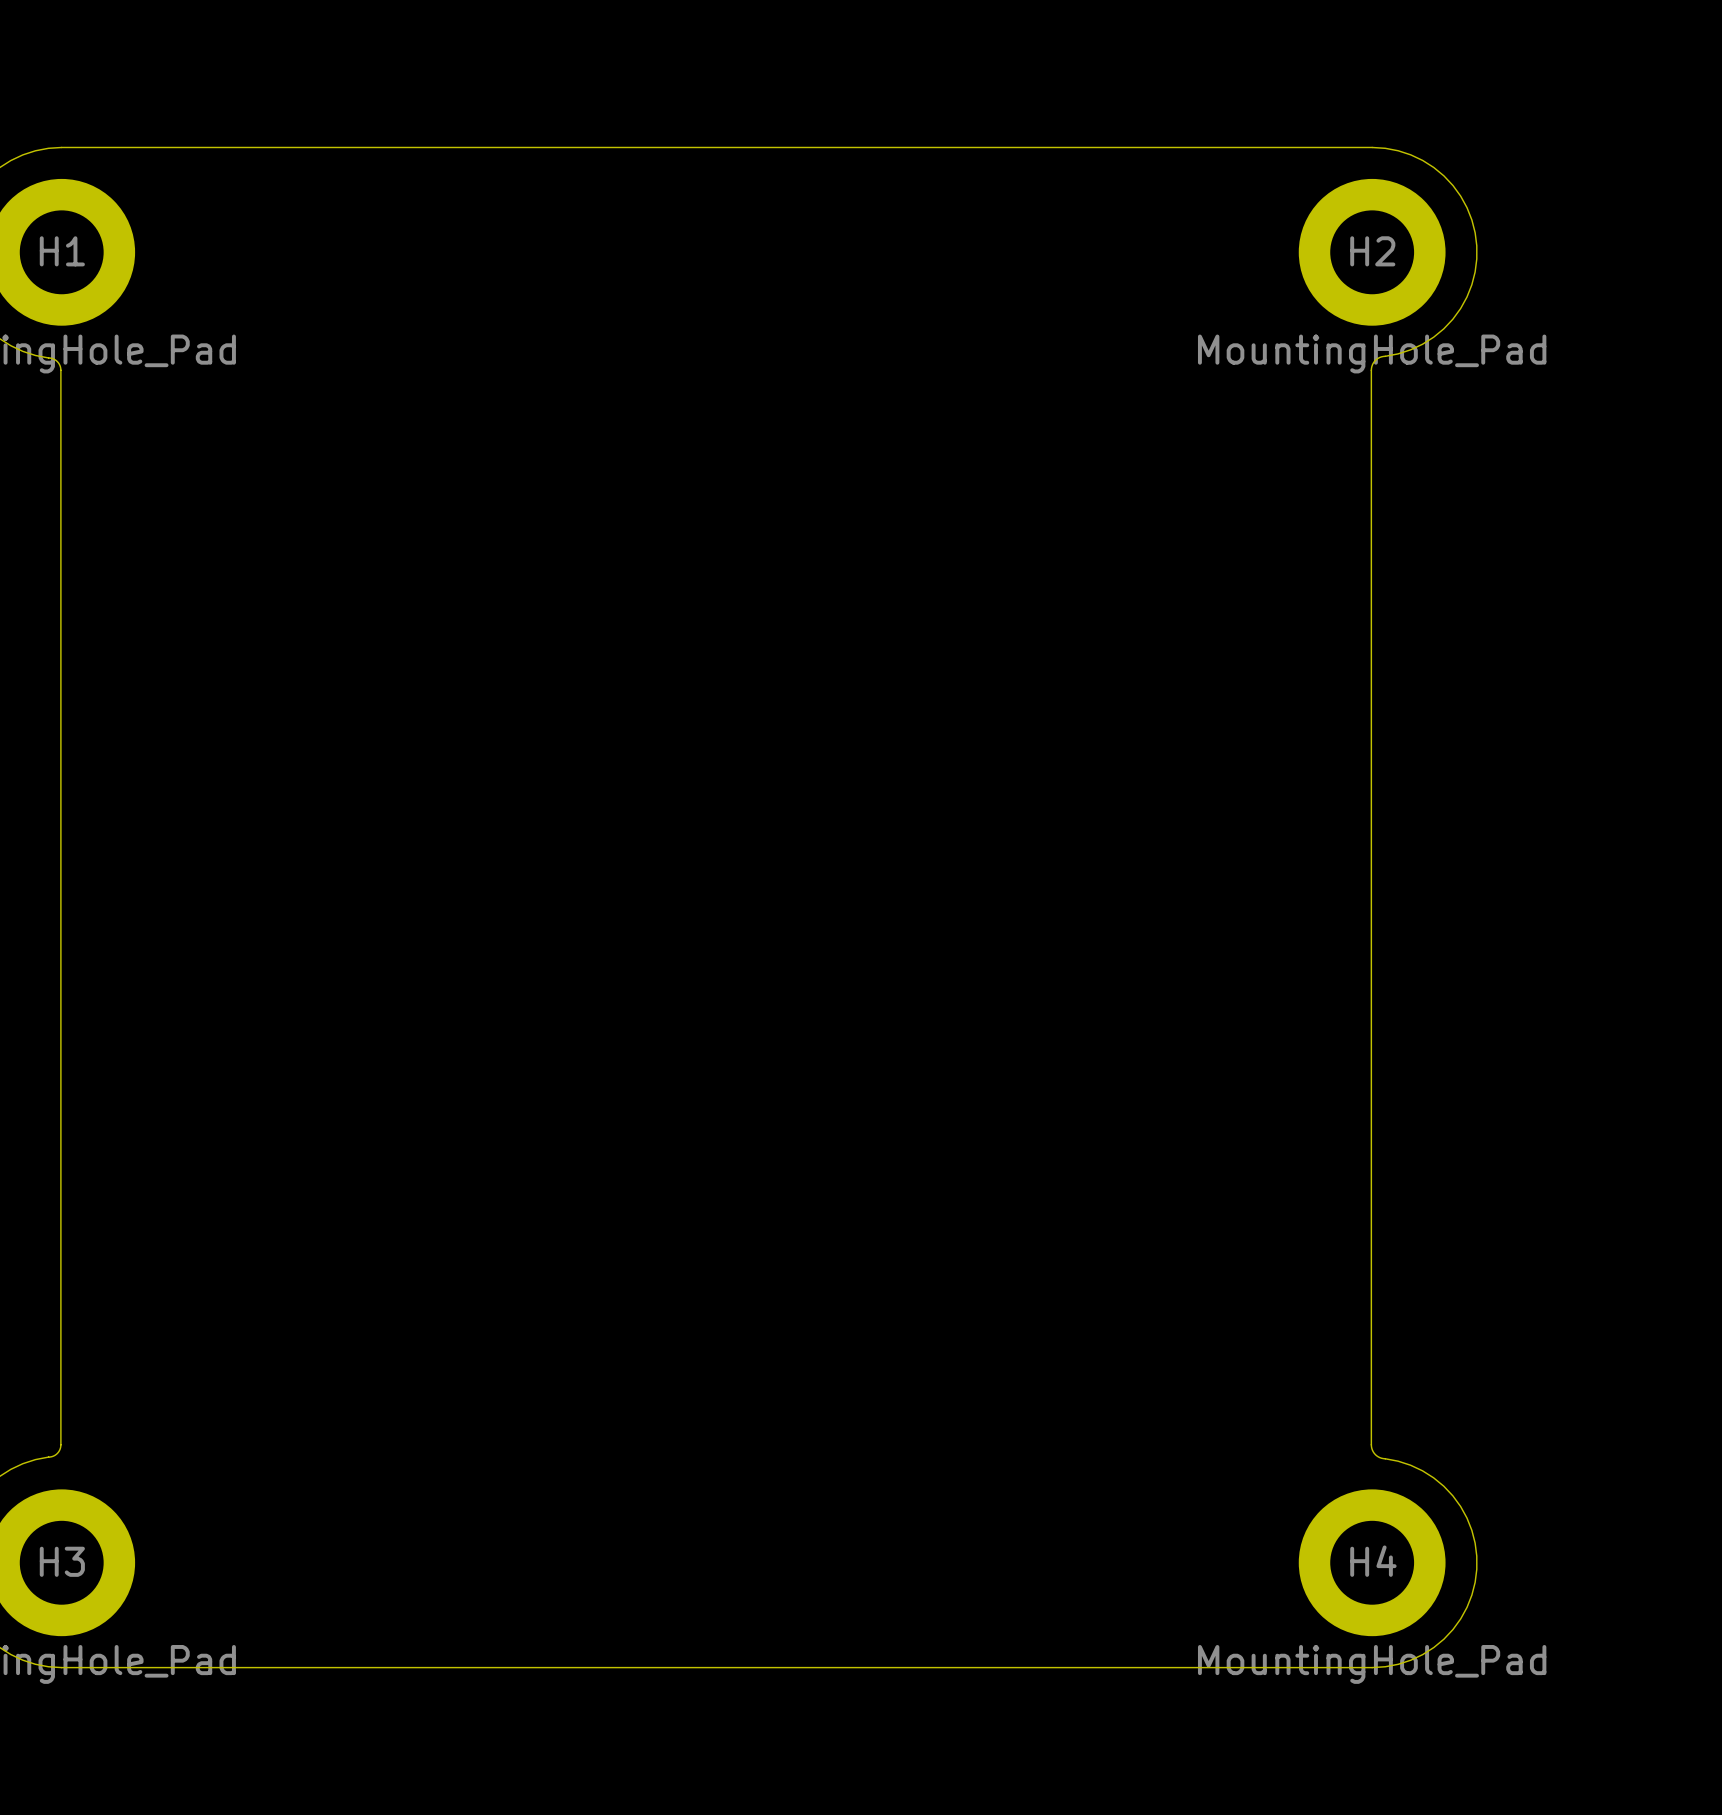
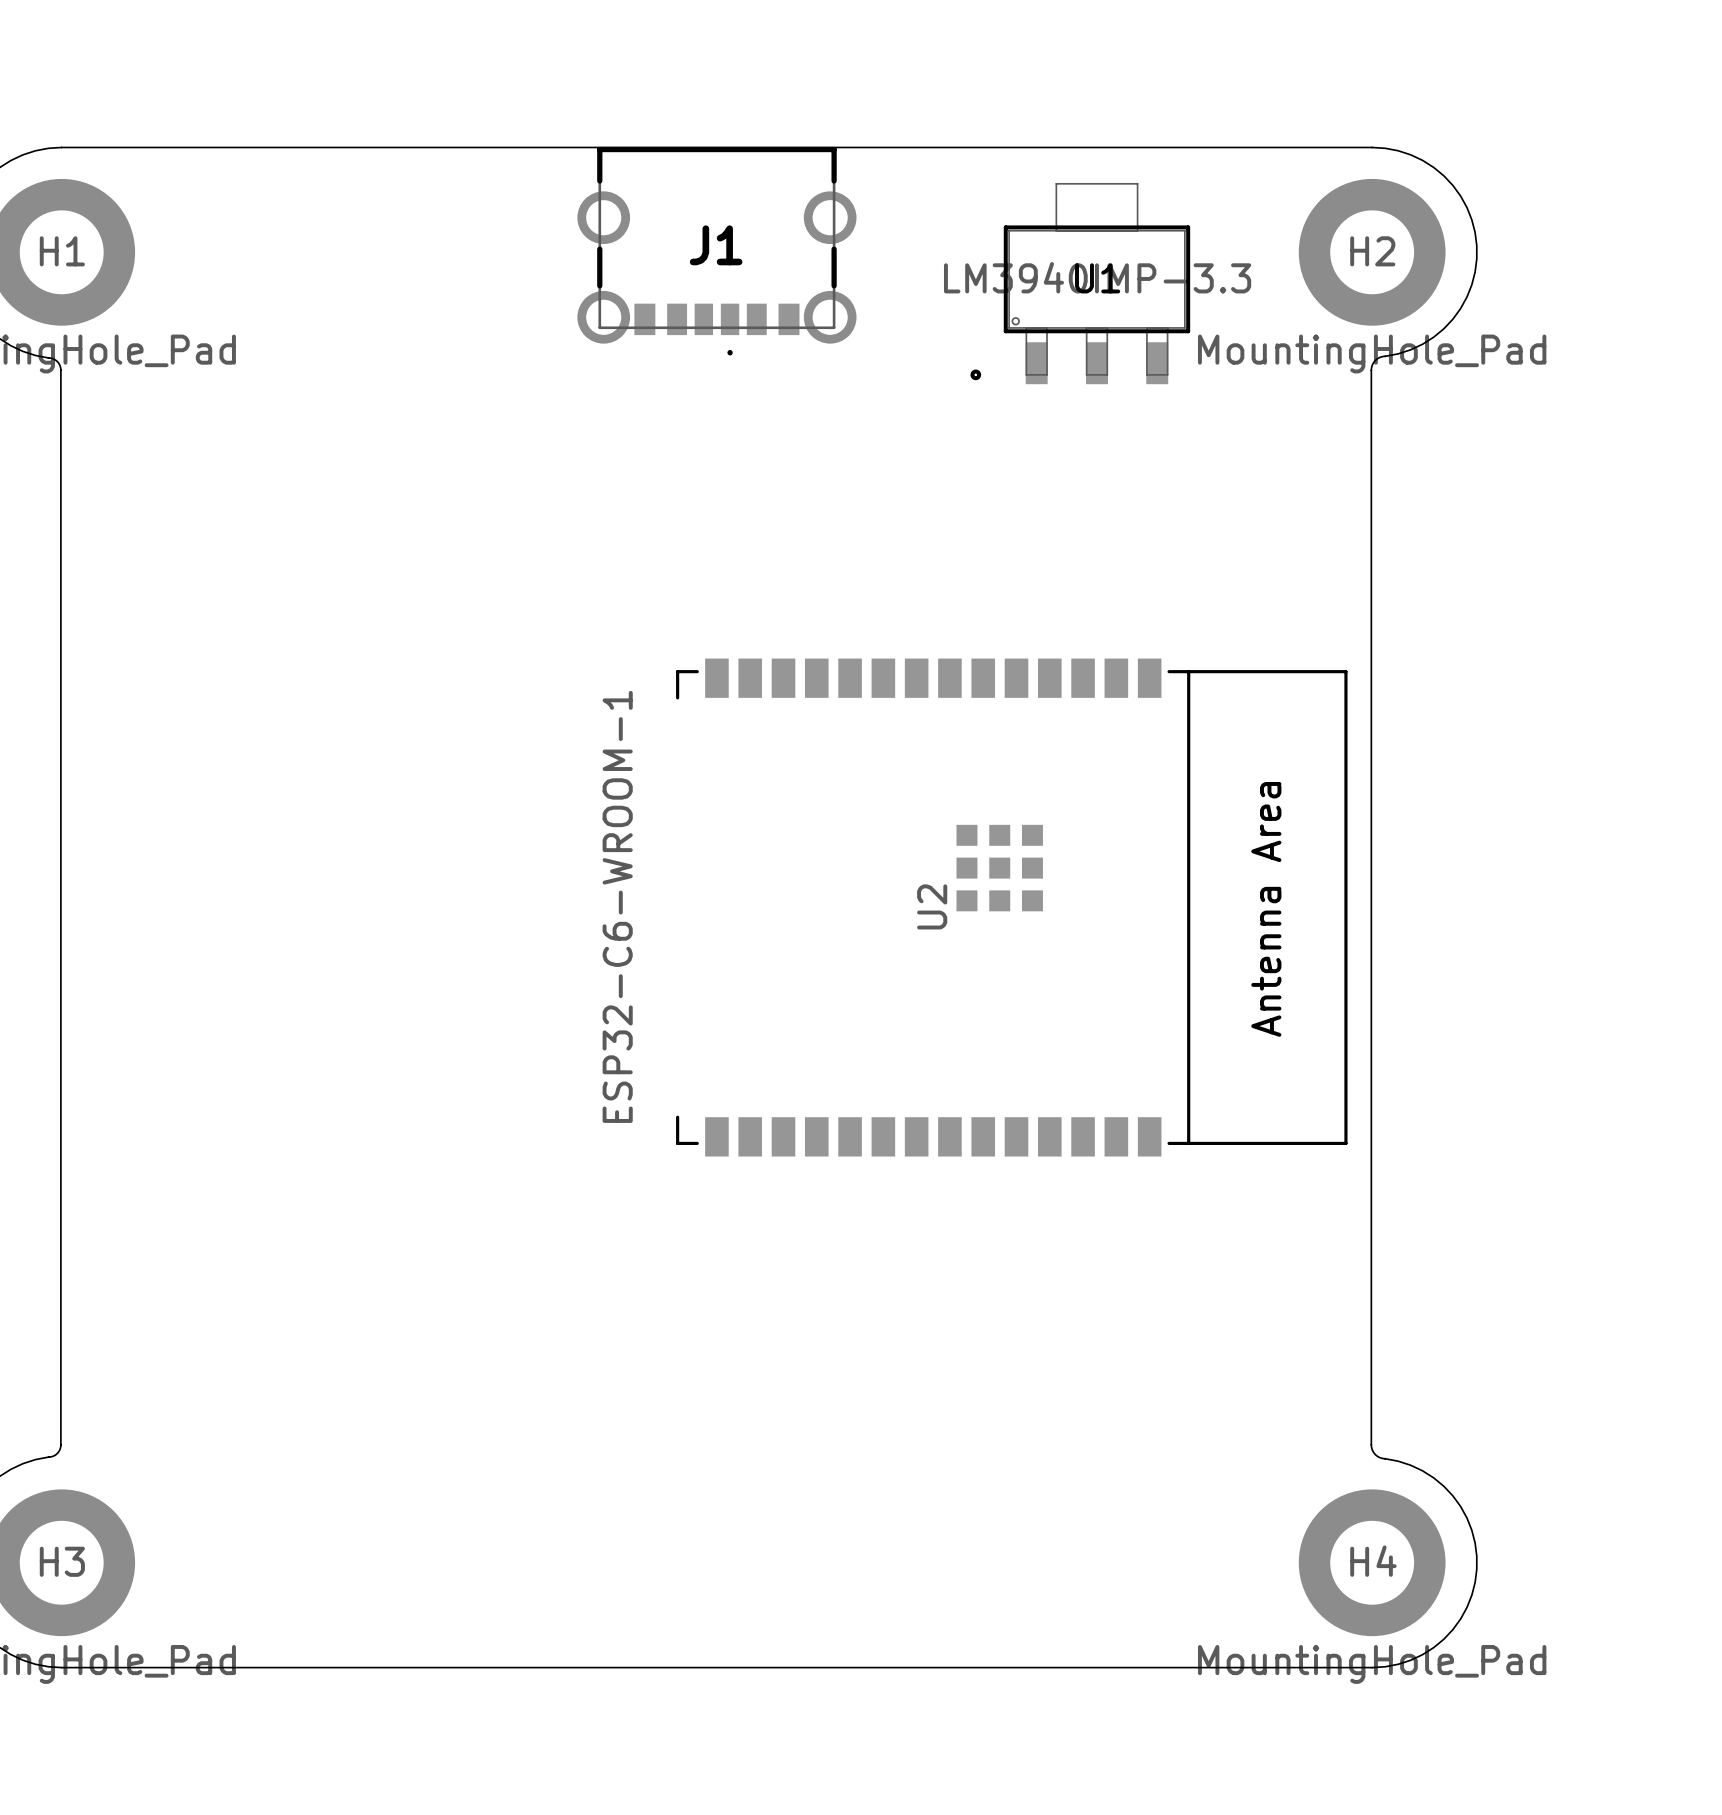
J1: none -> (716, 251)
U1: none -> LM3940IMP-3.3 (1080, 283)
U2: none -> ESP32-C6-WROOM-1 (1011, 907)

